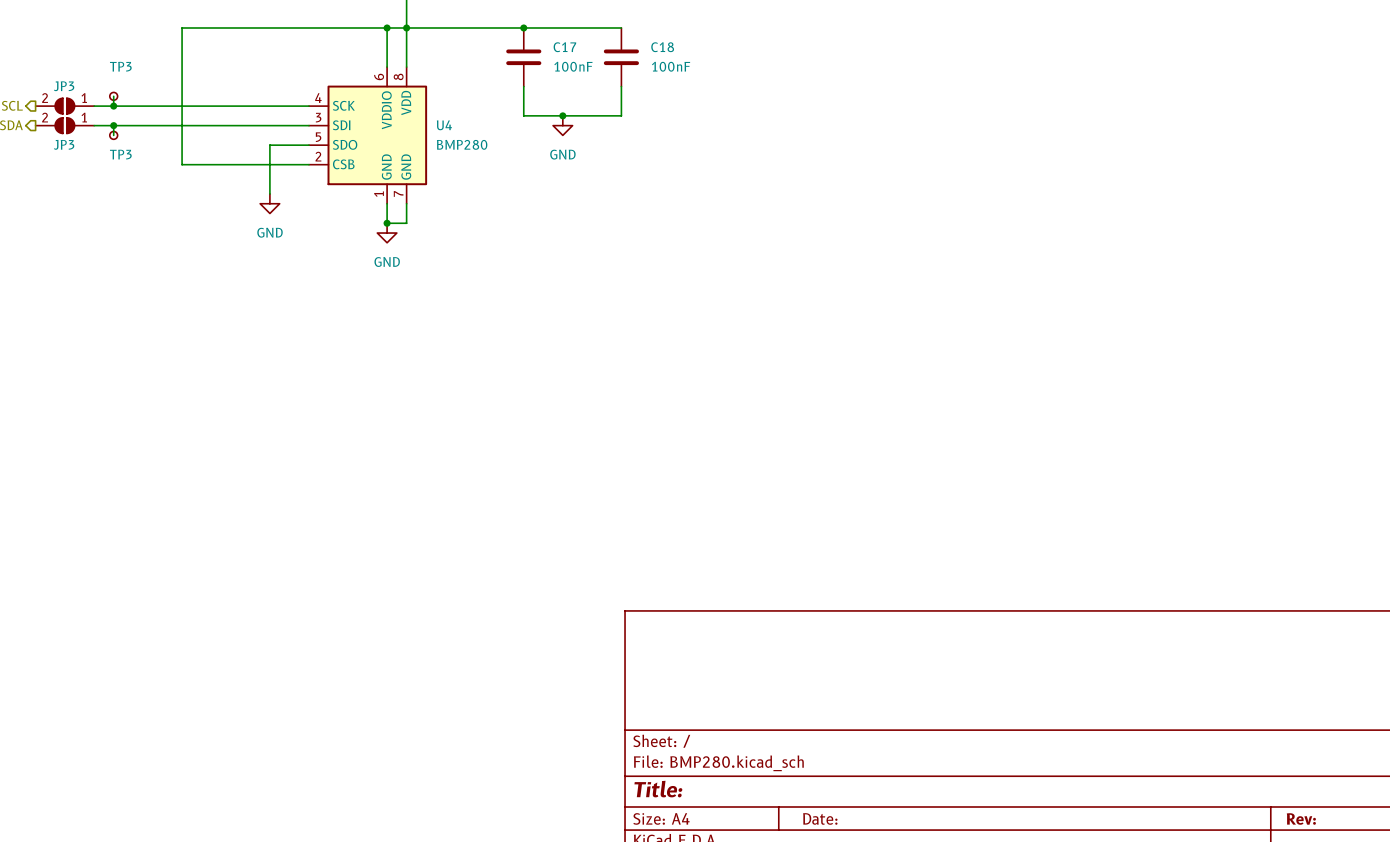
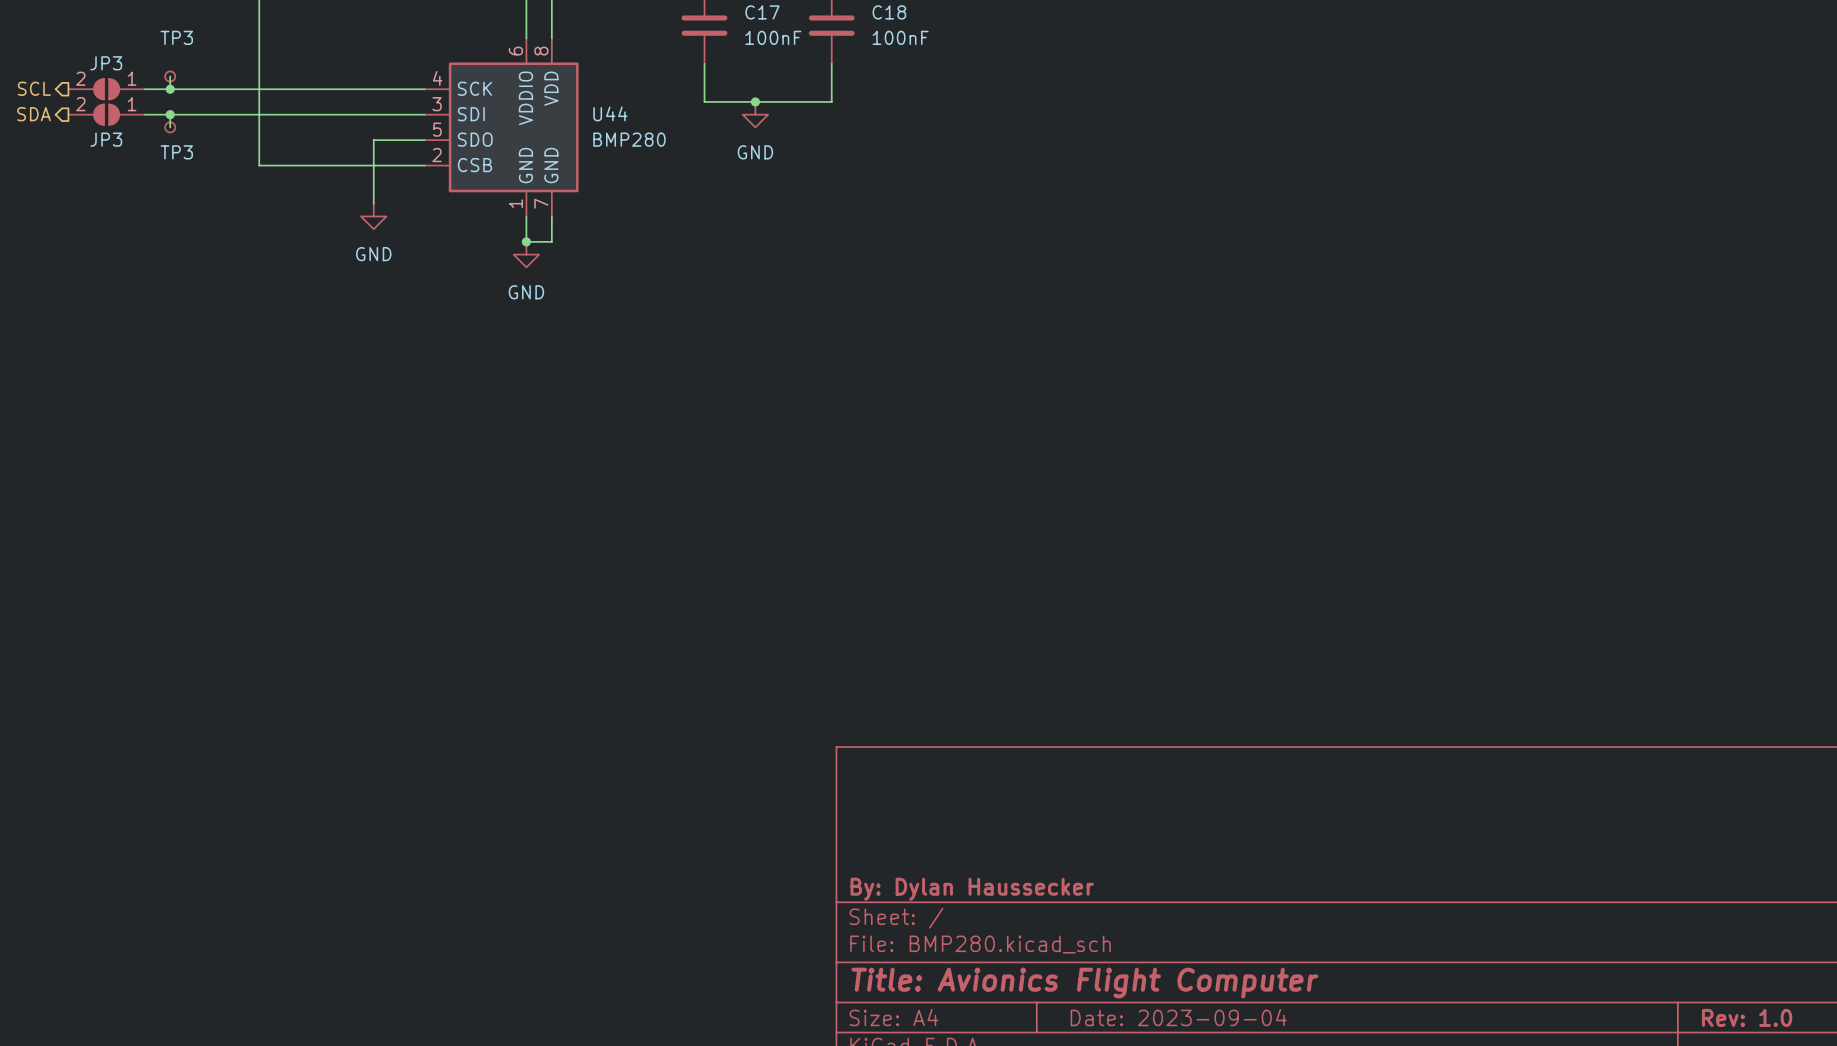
U4 name: U4 (444, 125) -> U44 (610, 113)
title block: none -> By: Dylan Haussecker (972, 889)
title block: Title: (658, 789) -> Title: Avionics Flight Computer (1084, 983)
title block: Date: (820, 818) -> Date: 2023-09-04 (1178, 1017)
title block: Rev: (1301, 819) -> Rev: 1.0 (1747, 1017)

